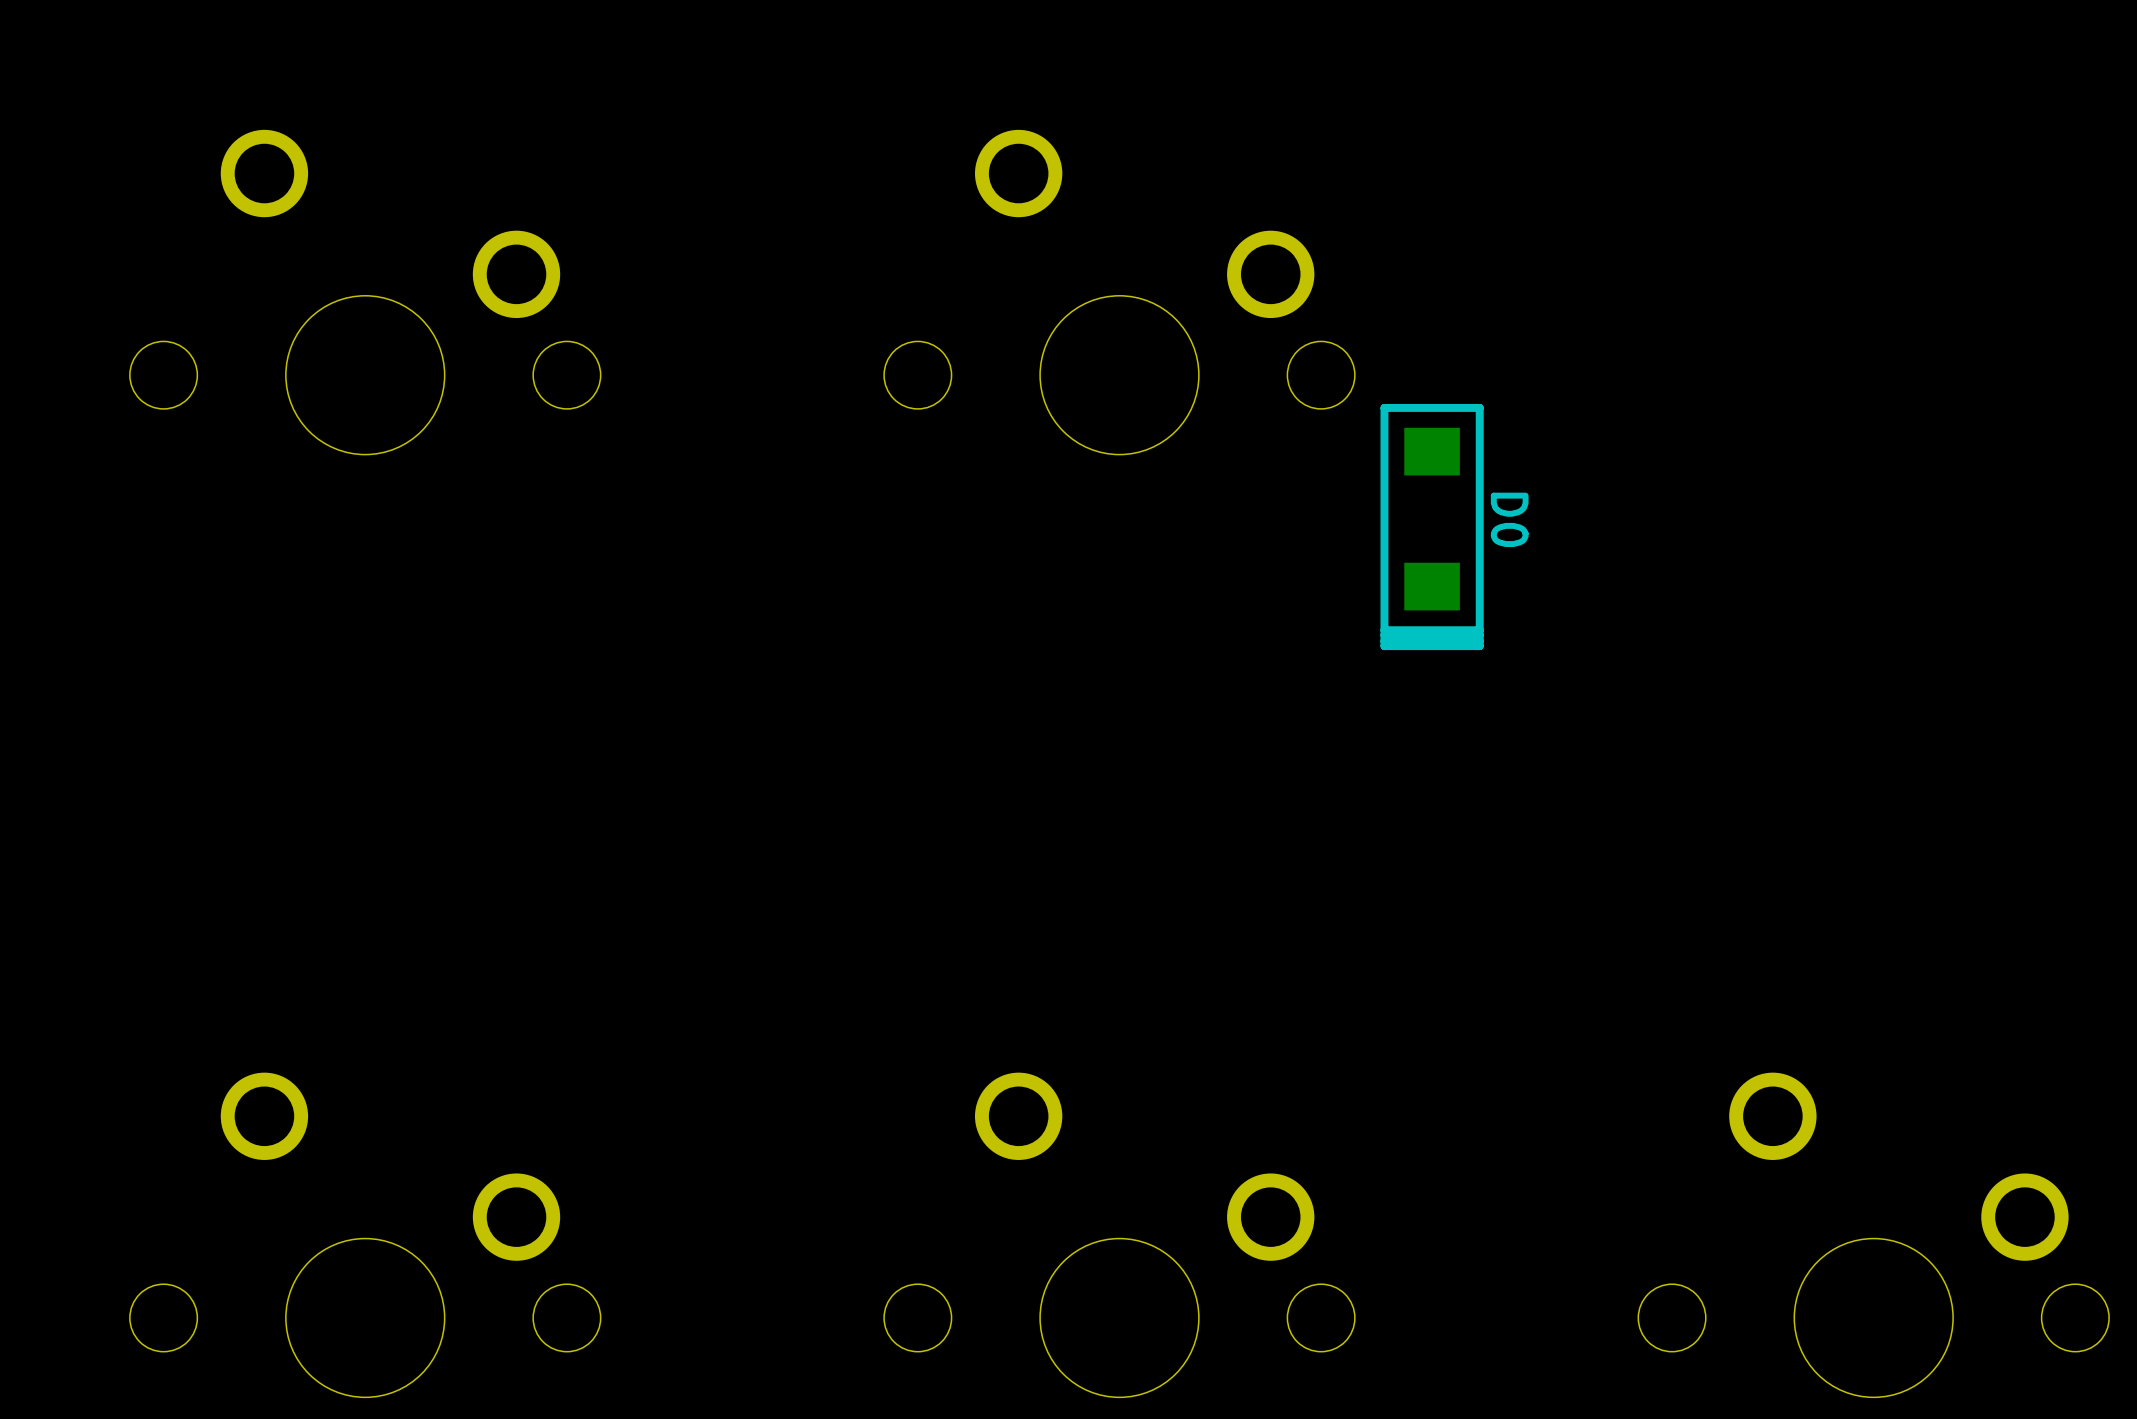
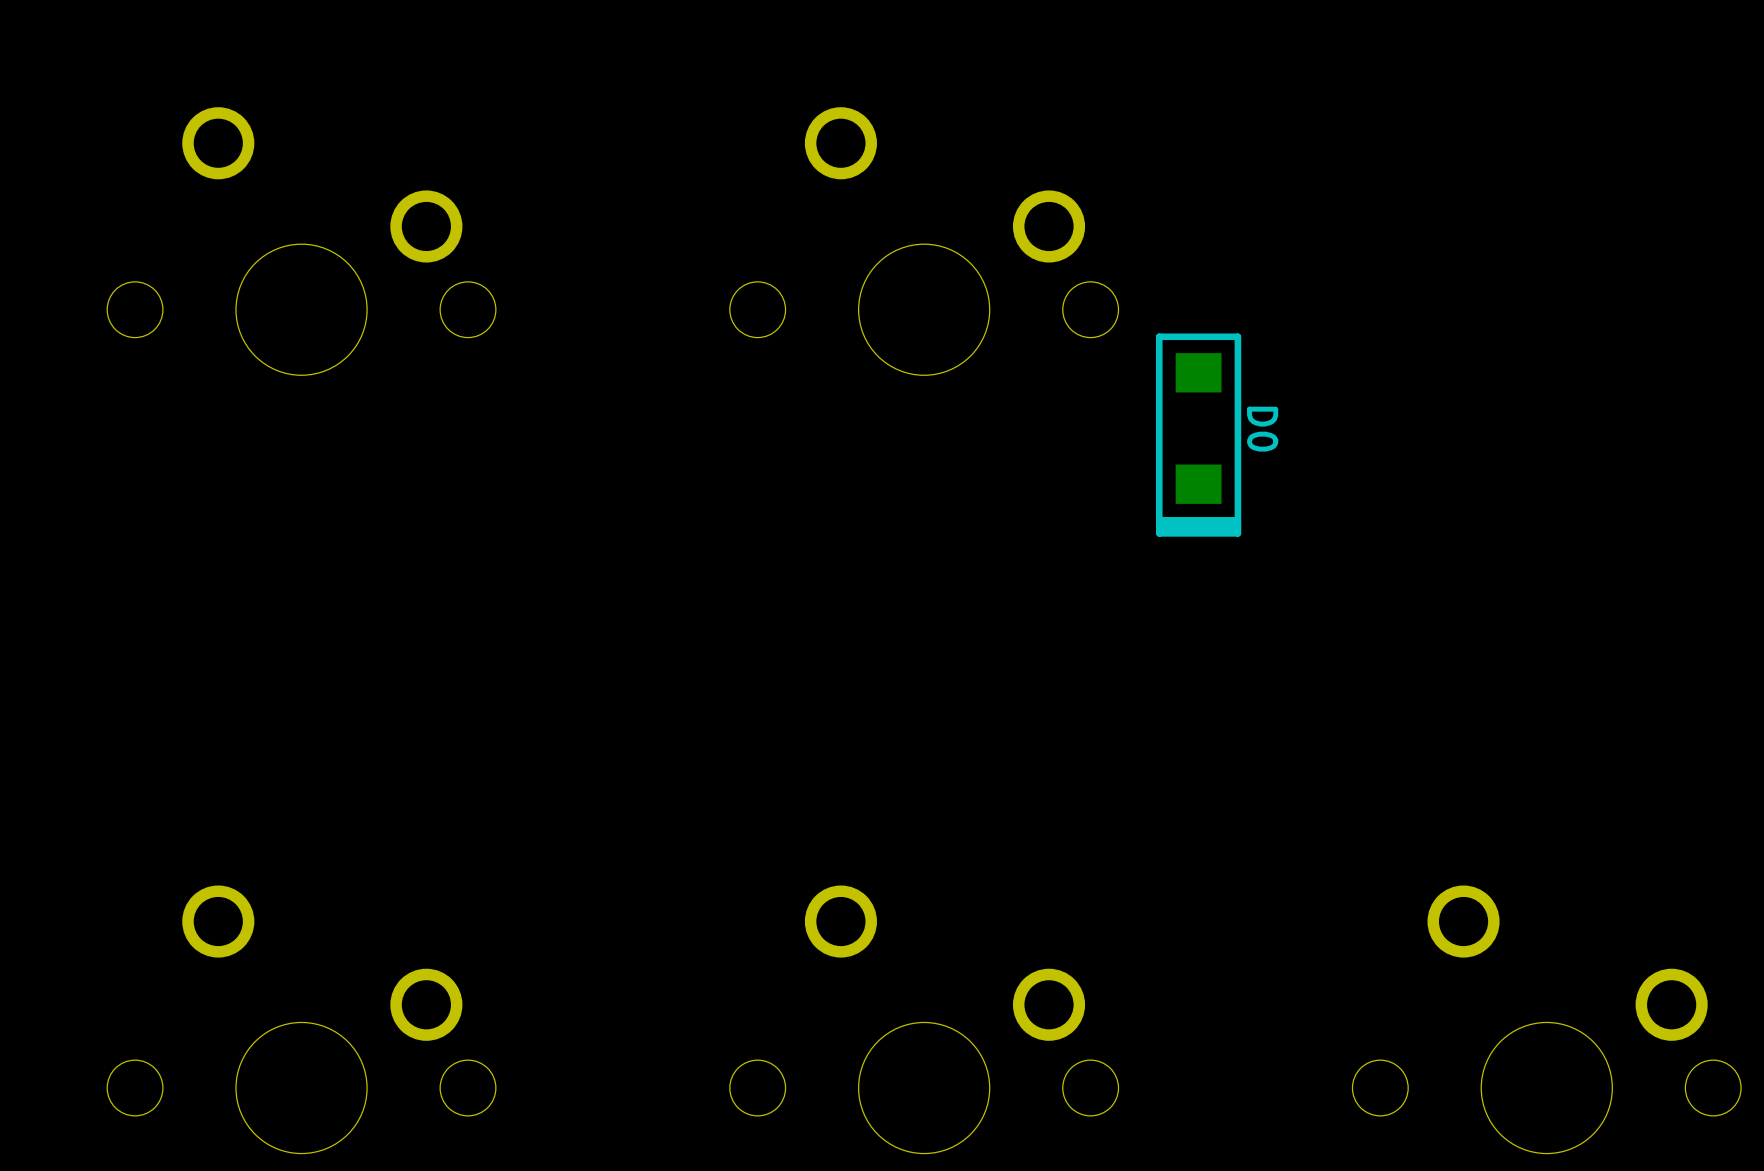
D0 position: (1432, 527) -> (1198, 435)

